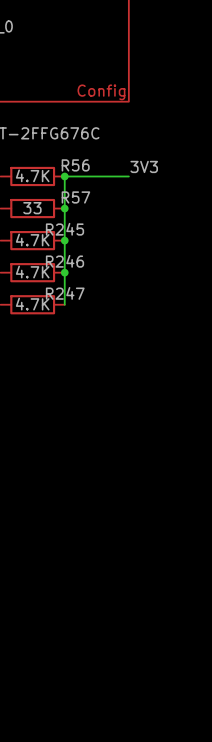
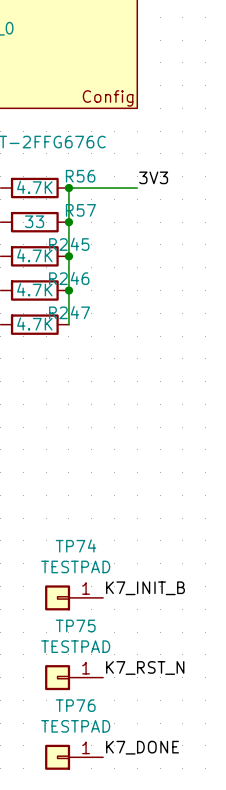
label: none -> K7_INIT_B (145, 588)
TP74: none -> TESTPAD (74, 597)
label: none -> K7_RST_N (145, 667)
TP75: none -> TESTPAD (74, 677)
label: none -> K7_DONE (142, 747)
TP76: none -> TESTPAD (74, 757)

